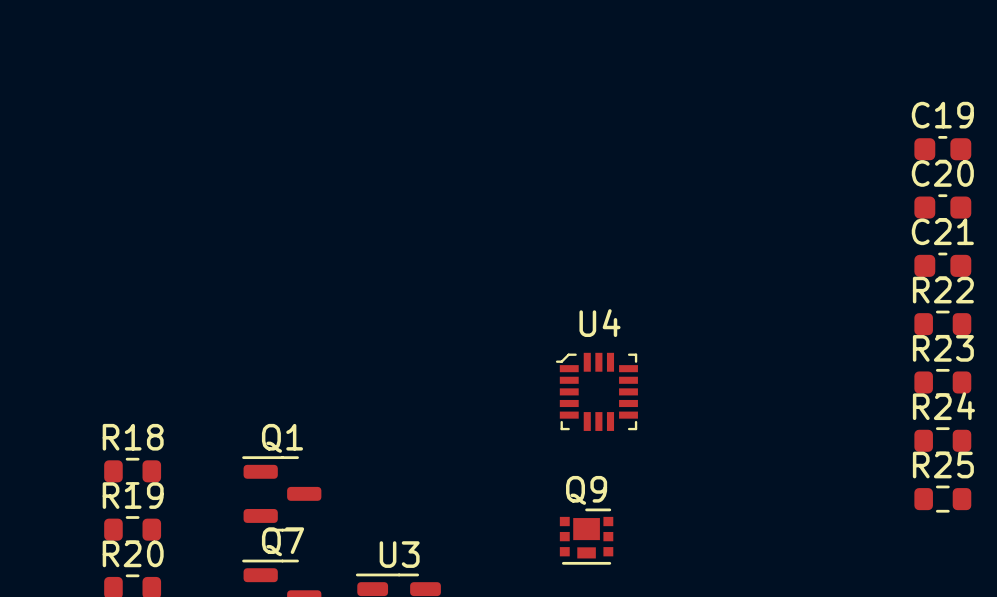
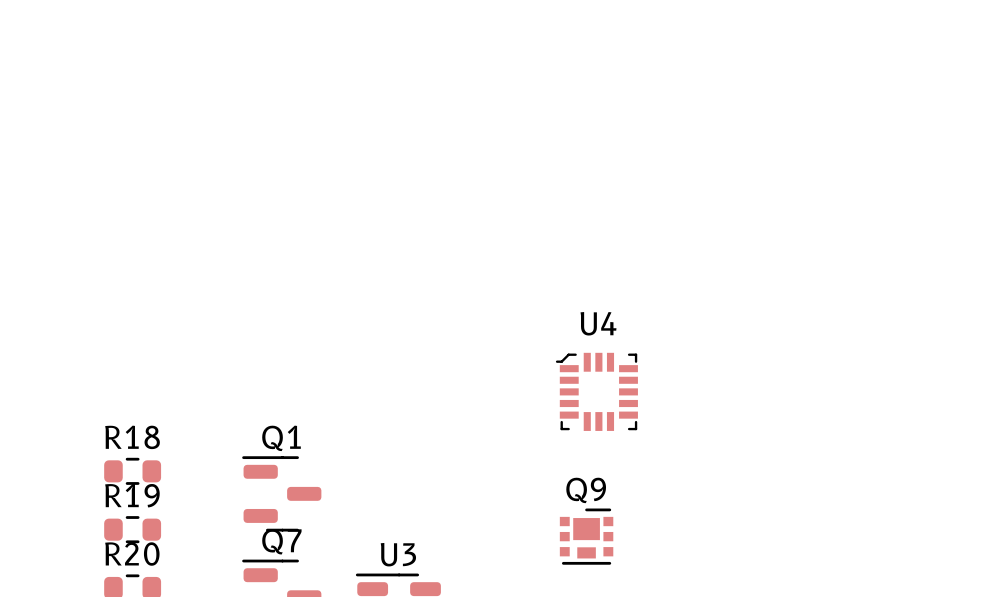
C19: (942, 149) -> none
C20: (942, 207) -> none
C21: (942, 265) -> none
R22: (942, 324) -> none
R23: (942, 382) -> none
R24: (942, 440) -> none
R25: (942, 499) -> none

